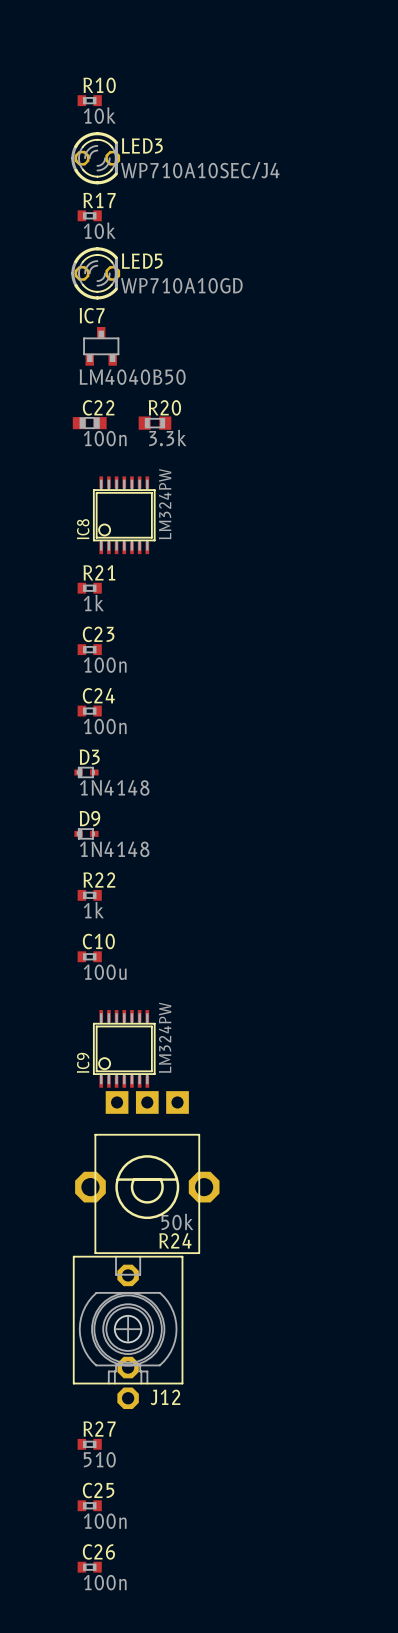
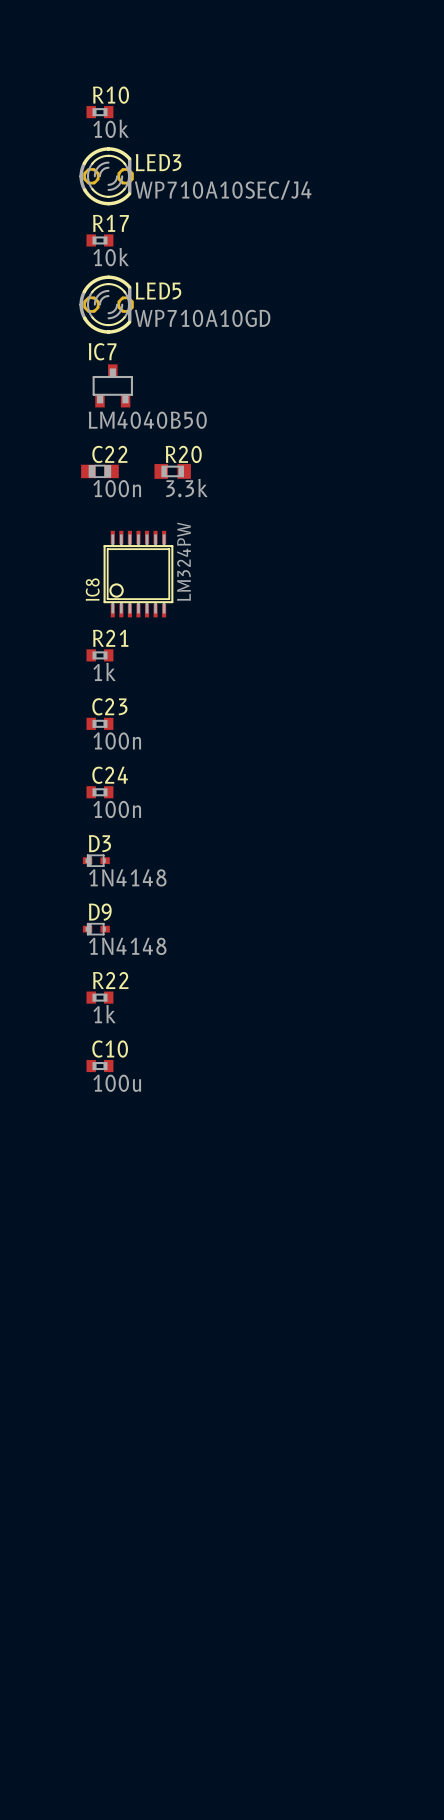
IC9: LM324PW (124, 1048) -> none
R24: 50k (147, 1172) -> none
J12: (128, 1332) -> none
R27: 510 (89, 1444) -> none
C25: 100n (89, 1505) -> none
C26: 100n (89, 1567) -> none

